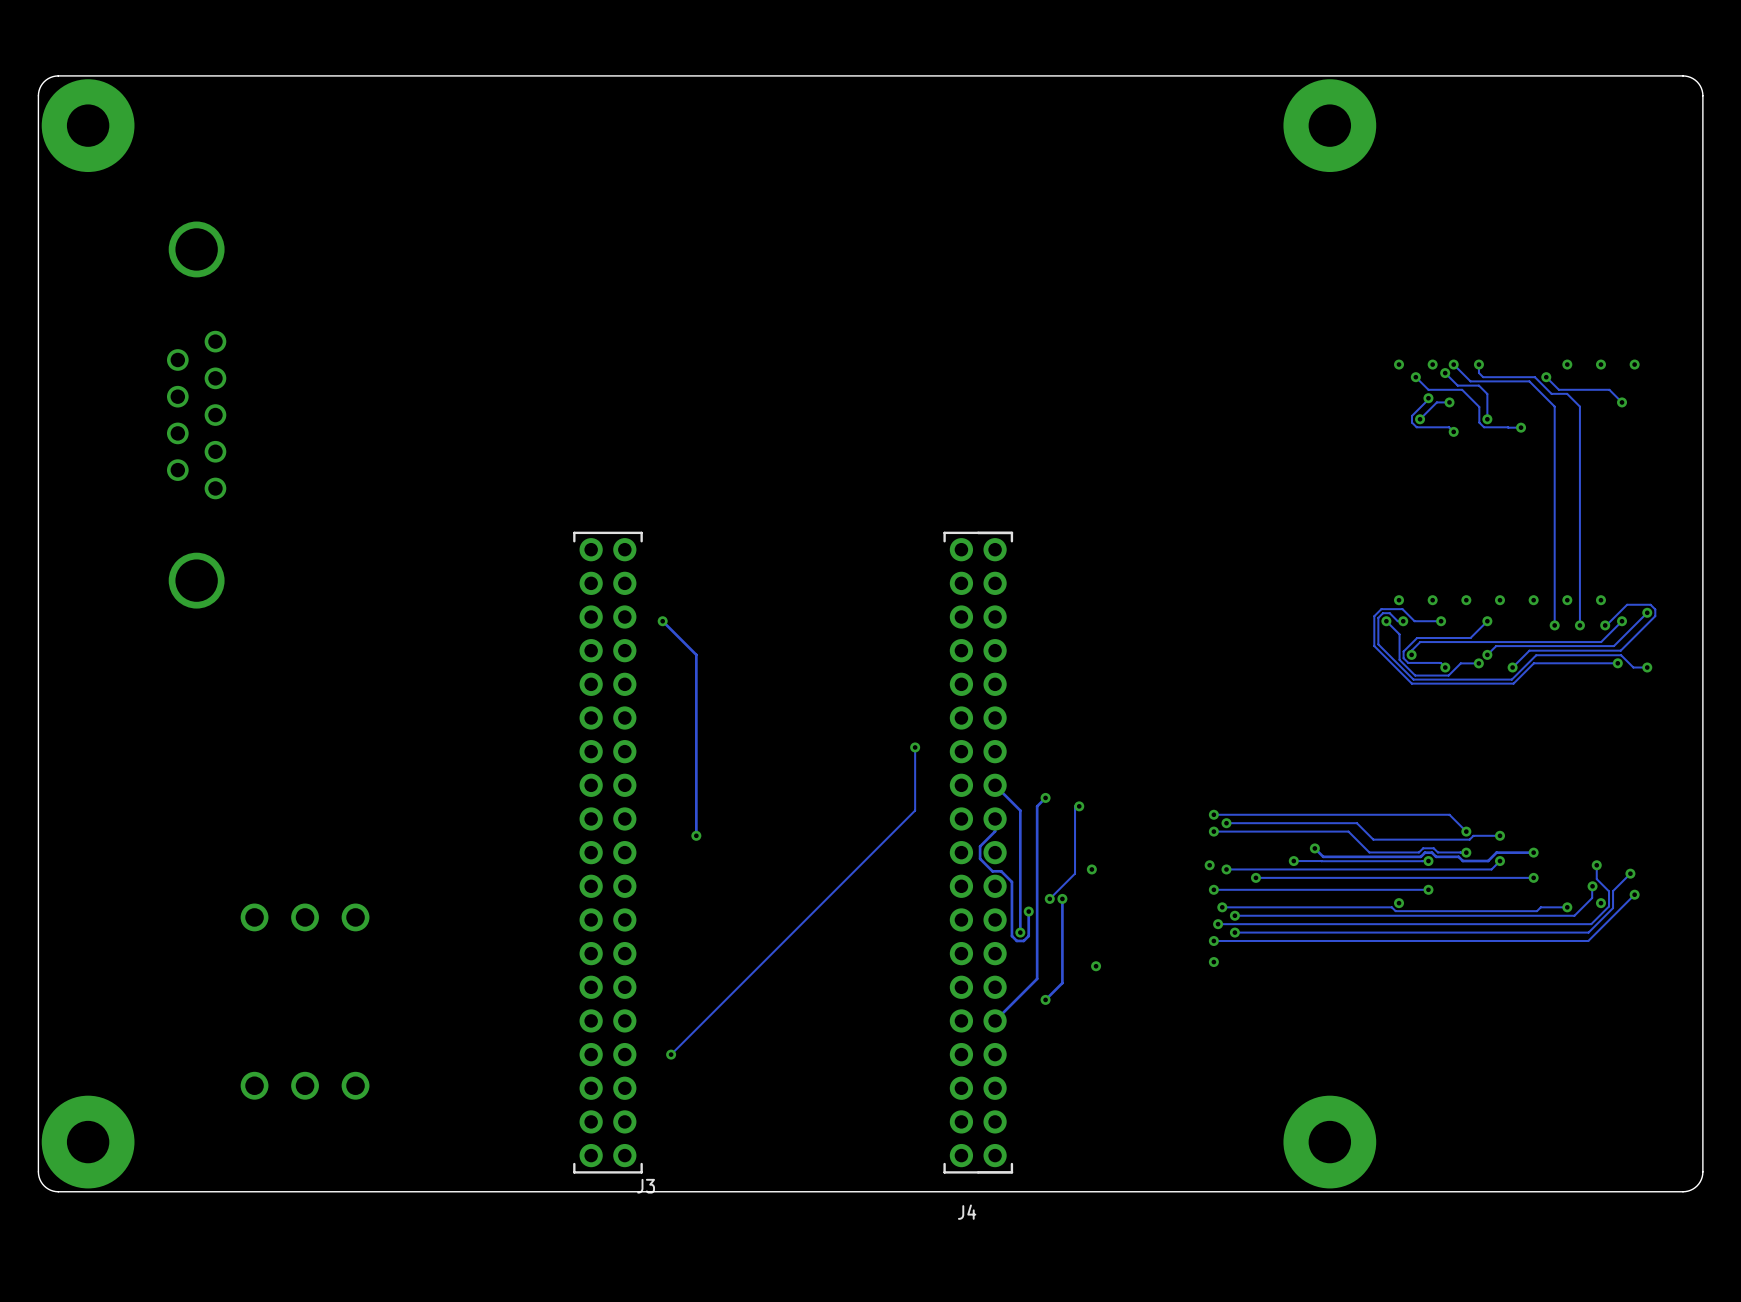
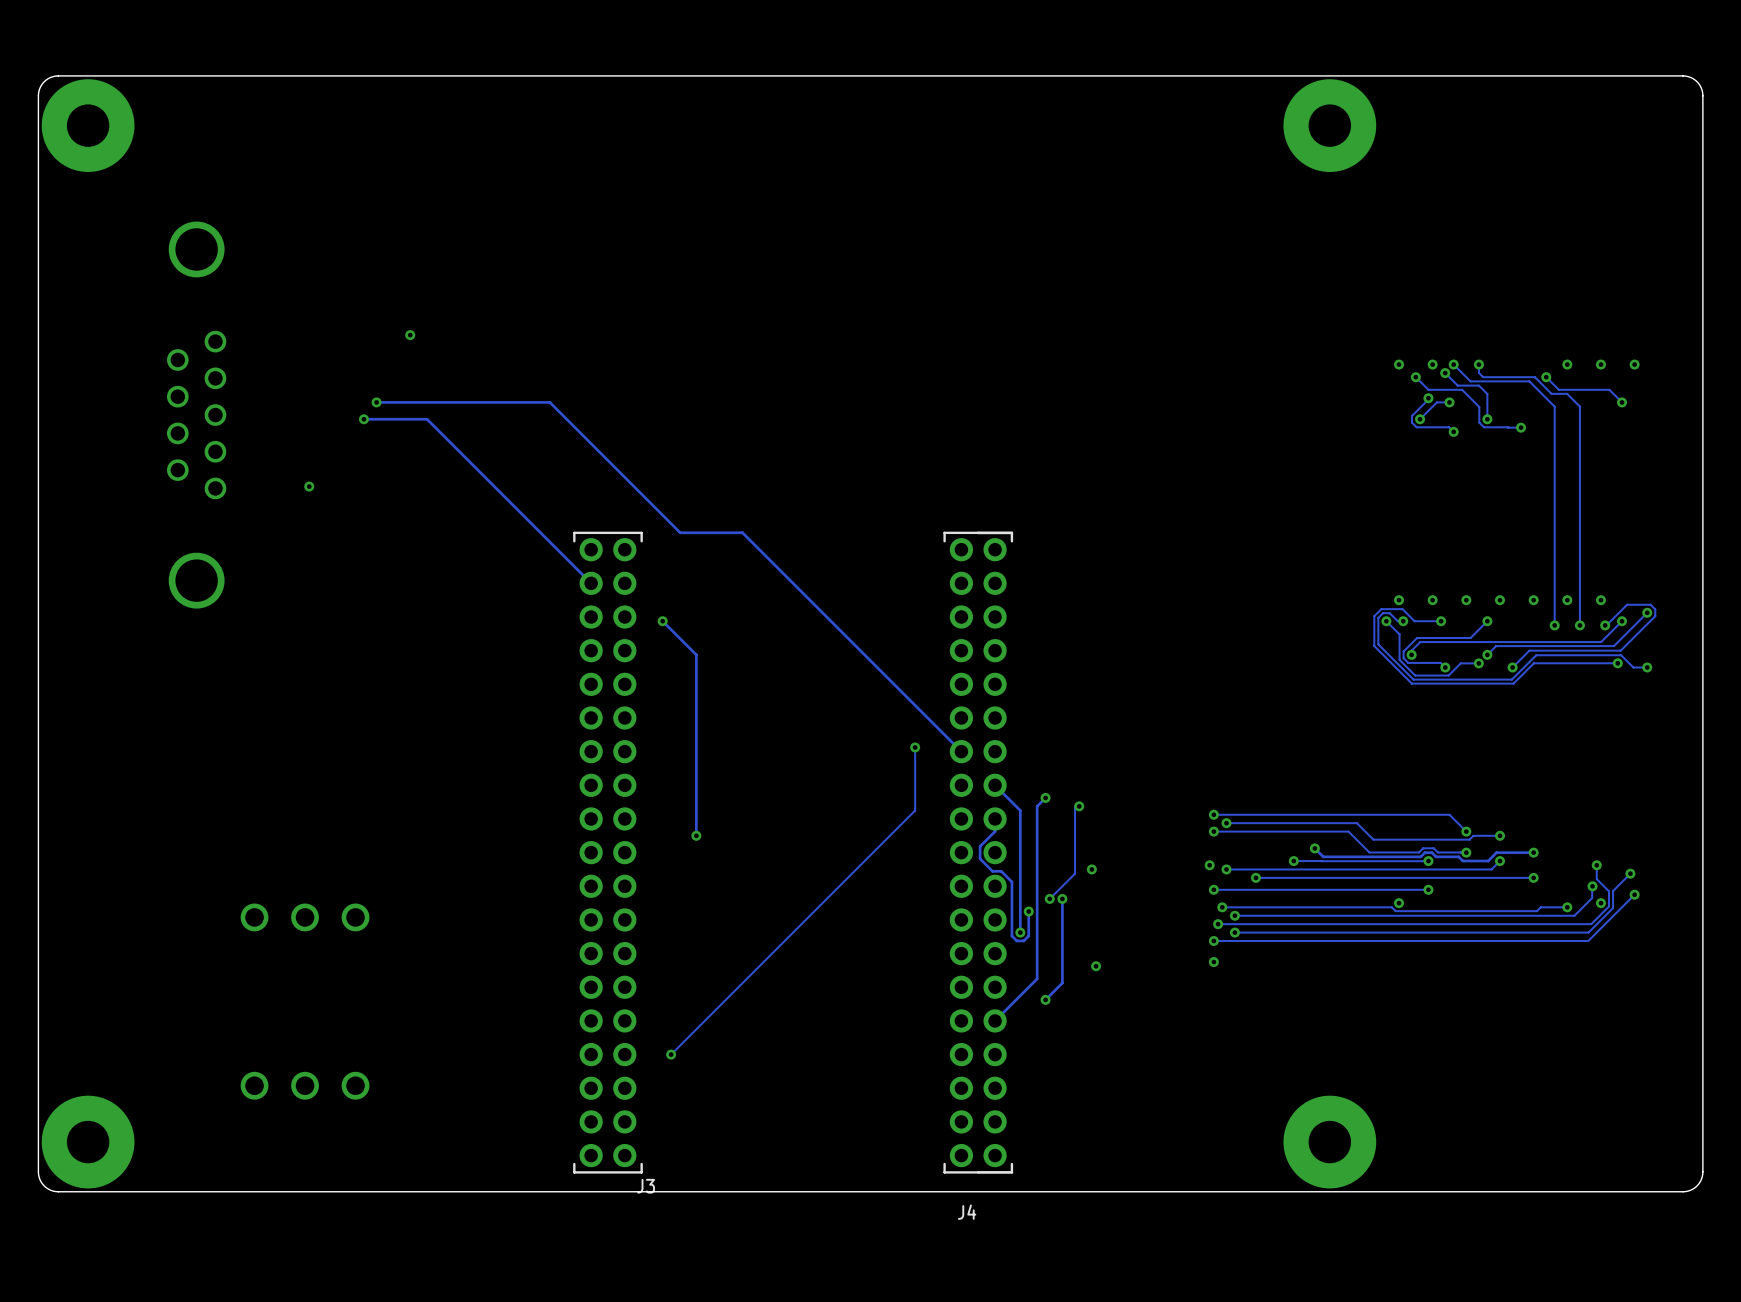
via: none -> (410, 335)
track: none -> (376, 402) (549, 402) (680, 532) (742, 532) (961, 751)
via: none -> (376, 402)
track: none -> (363, 419) (427, 419) (591, 583)
via: none -> (363, 419)
via: none -> (309, 486)

